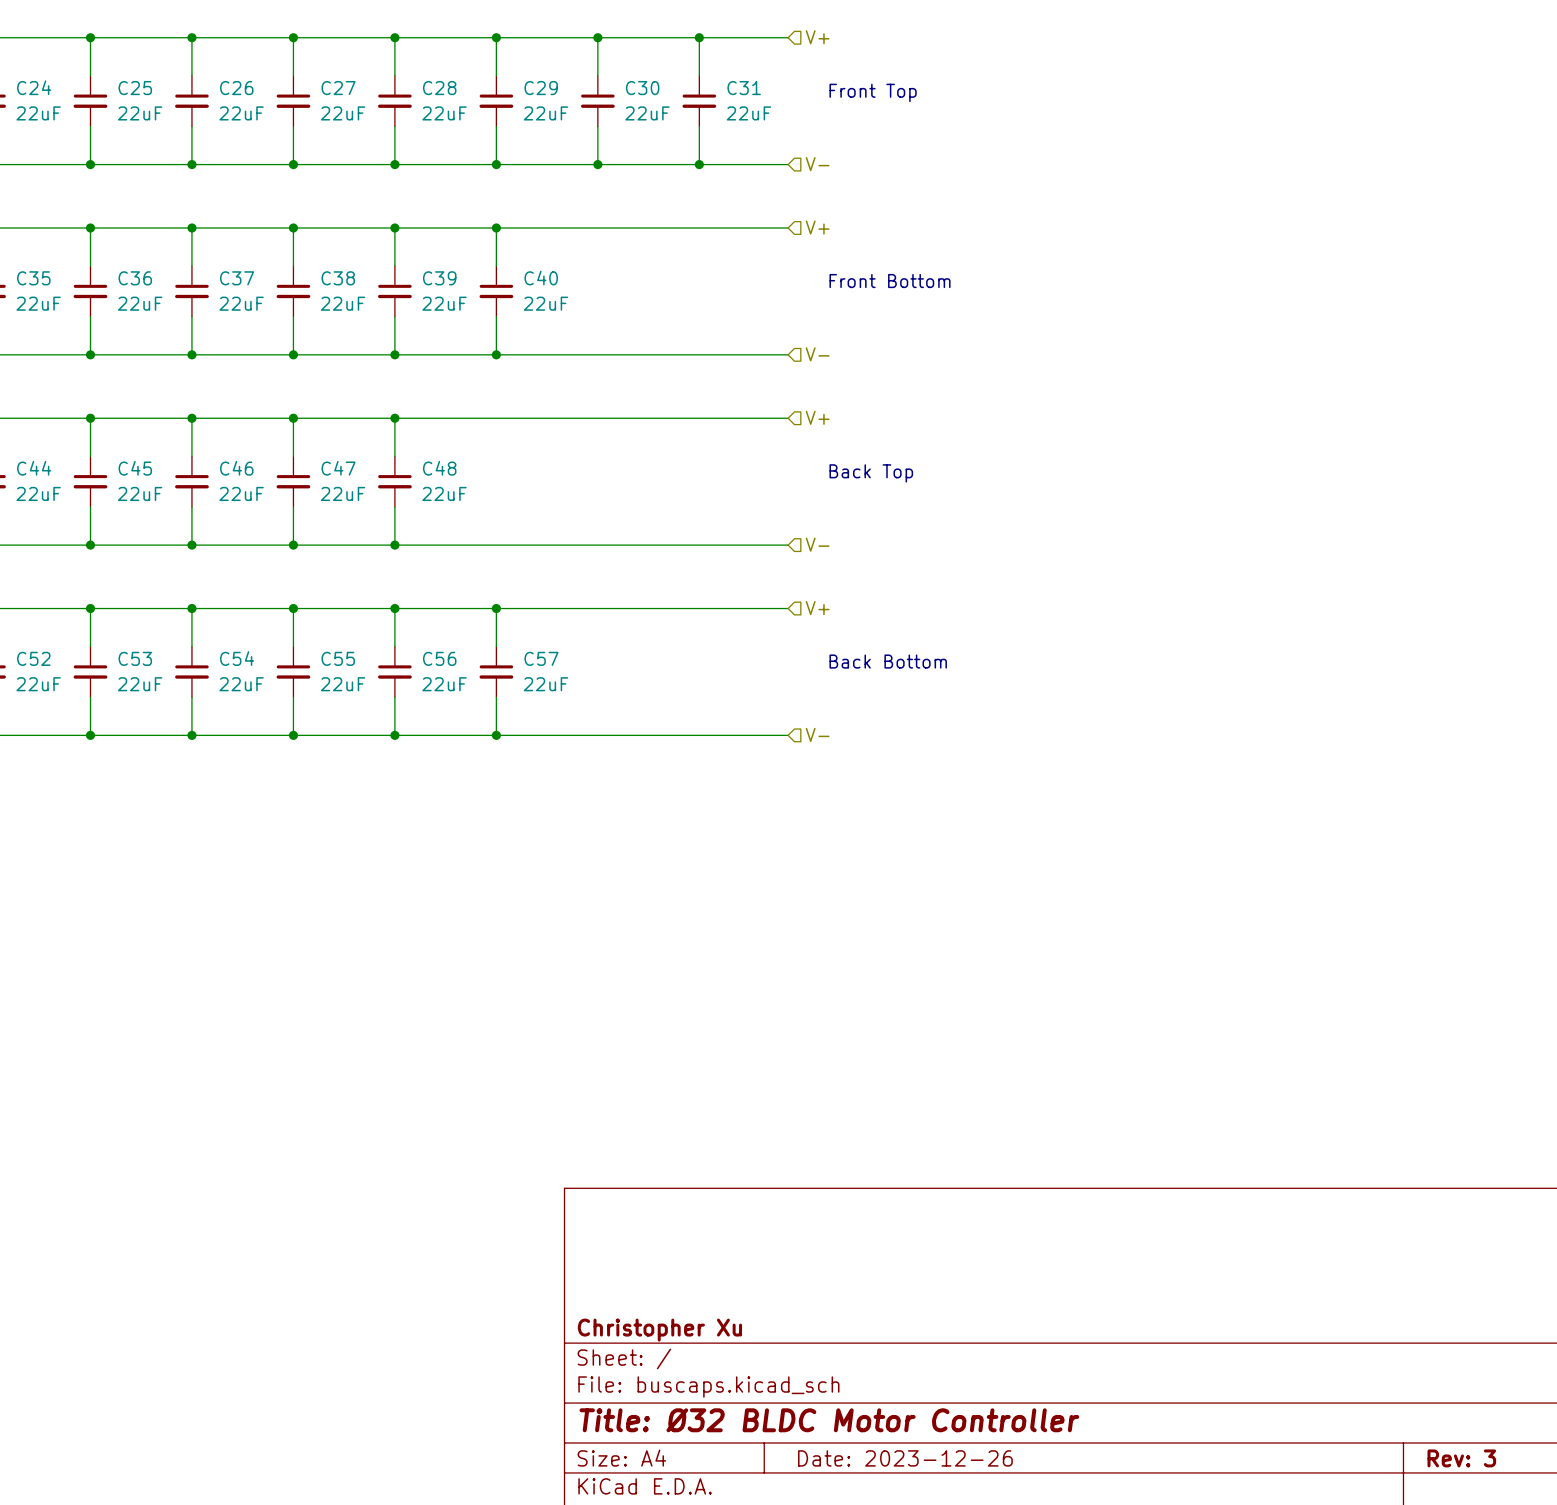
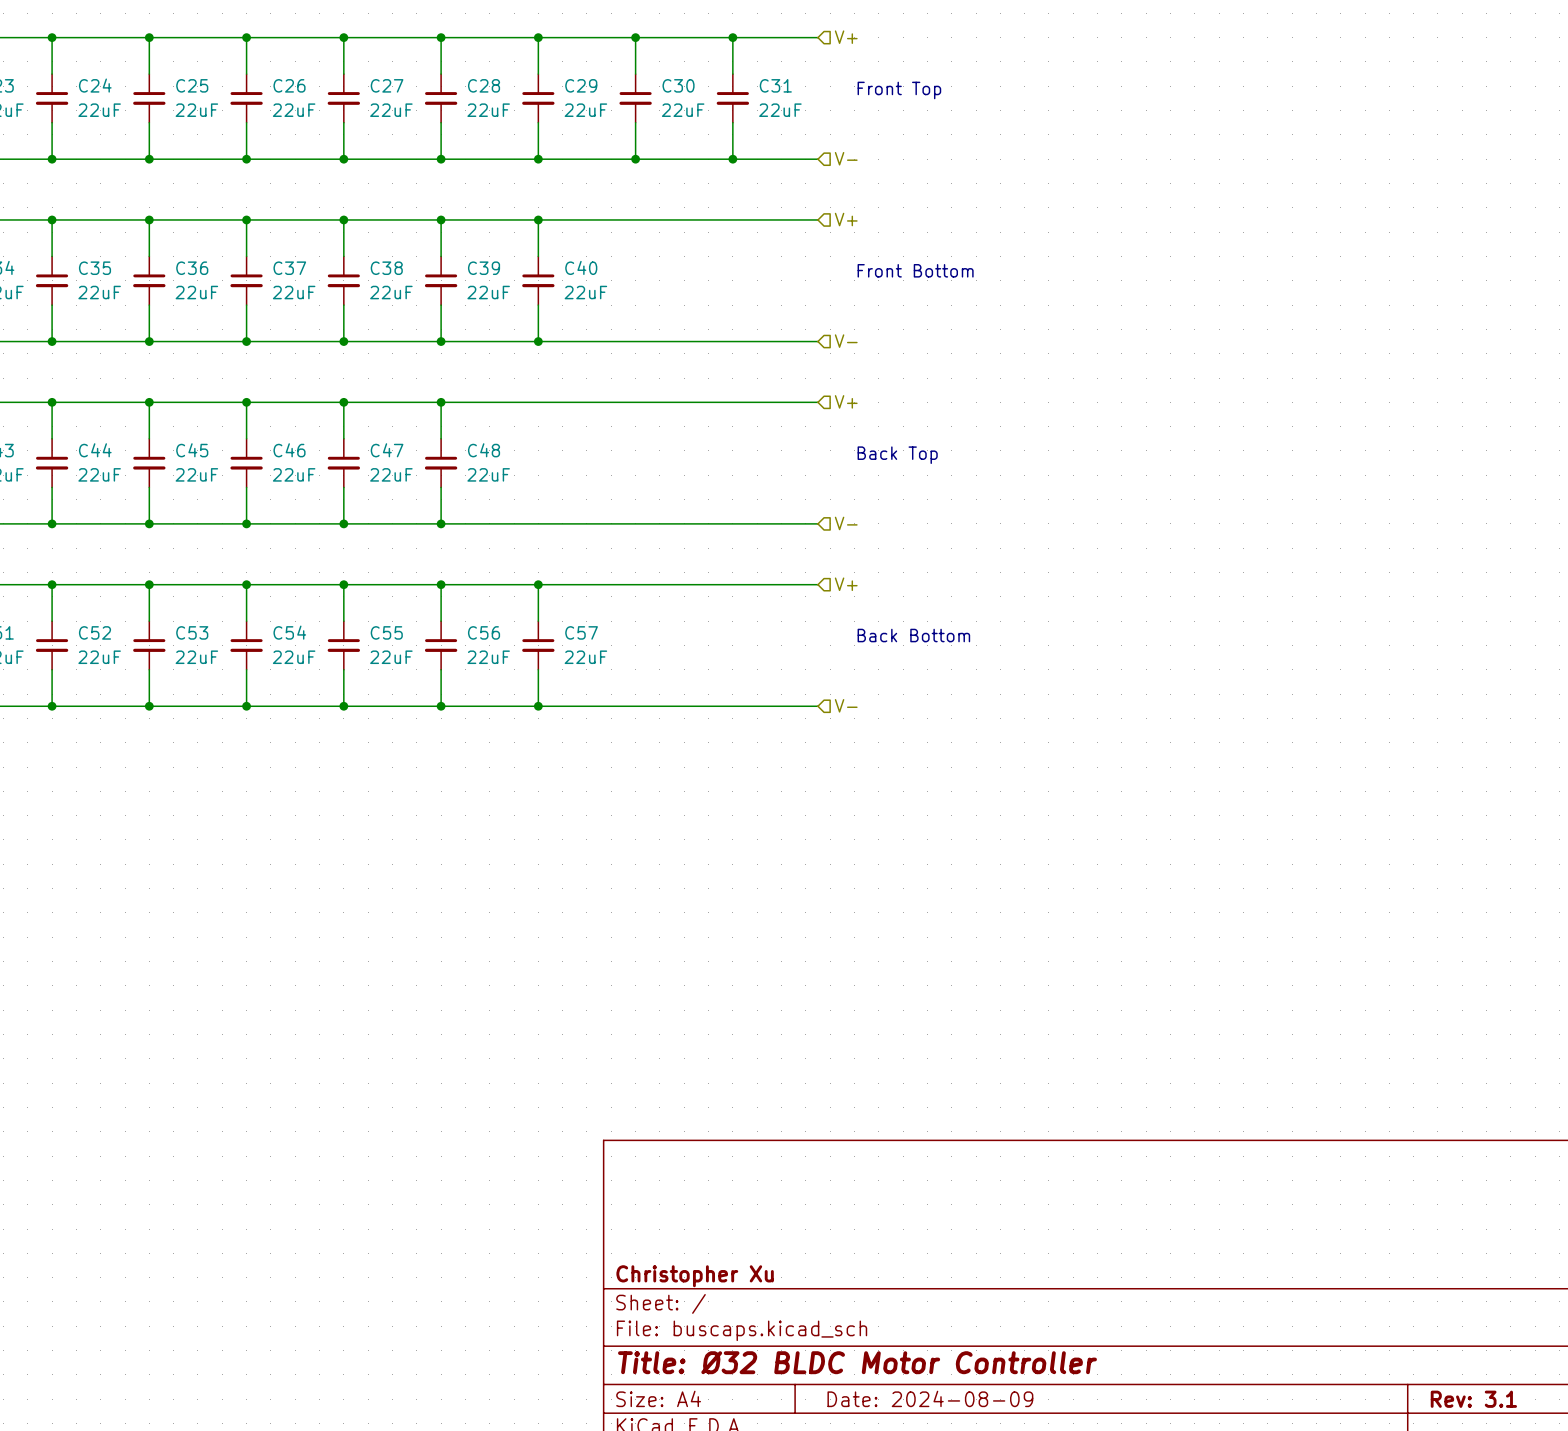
title block: Date: 2023-12-26 (905, 1458) -> Date: 2024-08-09 (930, 1398)
title block: Rev: 3 (1461, 1458) -> Rev: 3.1 (1473, 1399)

